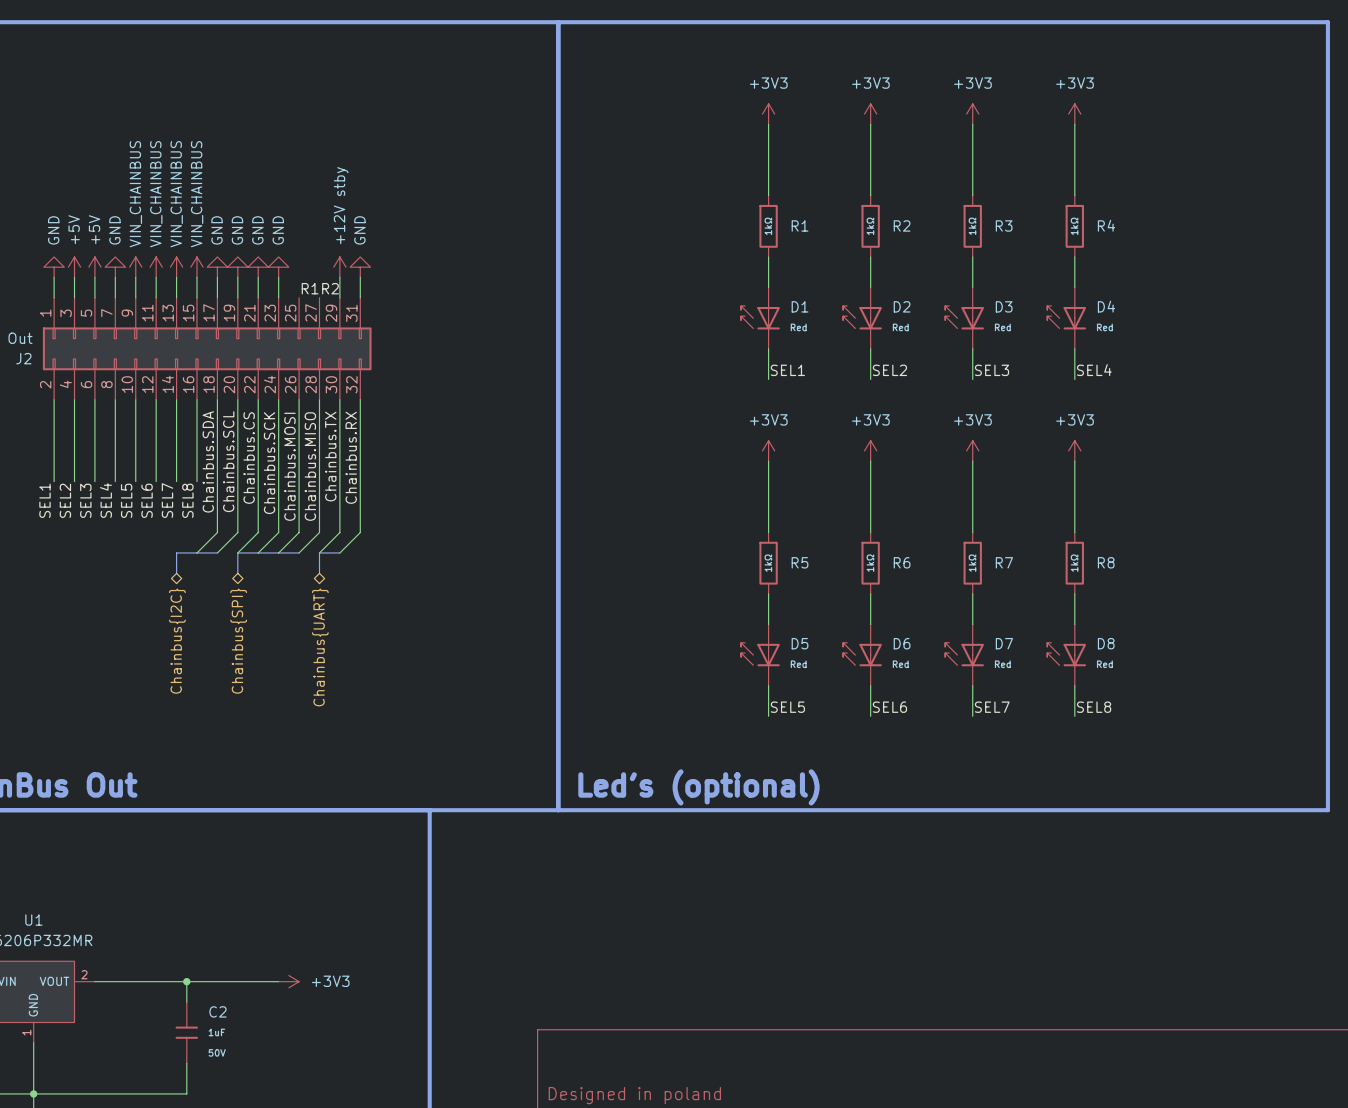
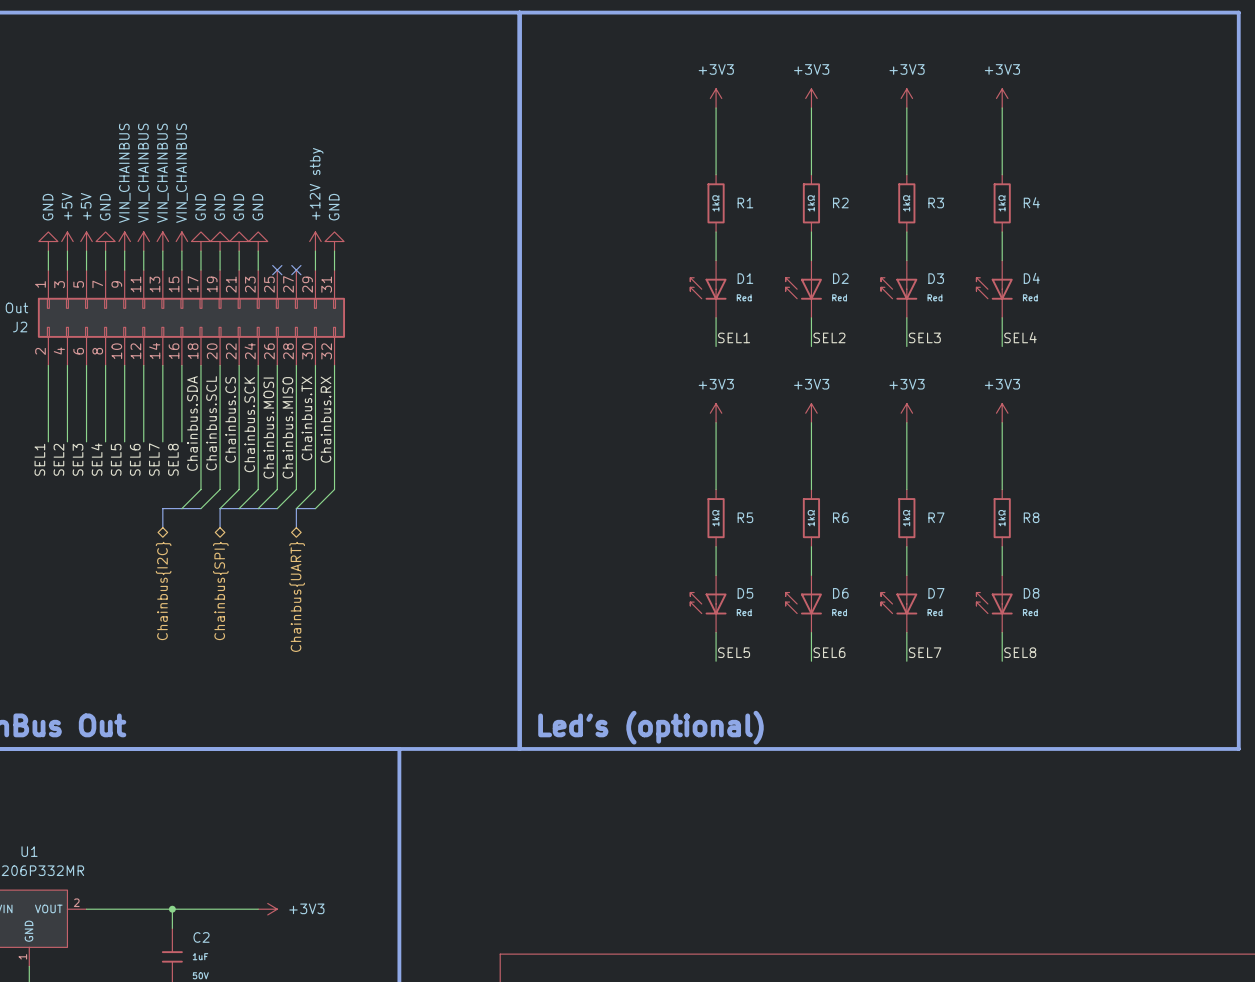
label: R1 (310, 288) -> none
label: R2 (330, 288) -> none
no-connect mark: none -> (277, 270)
no-connect mark: none -> (296, 270)

